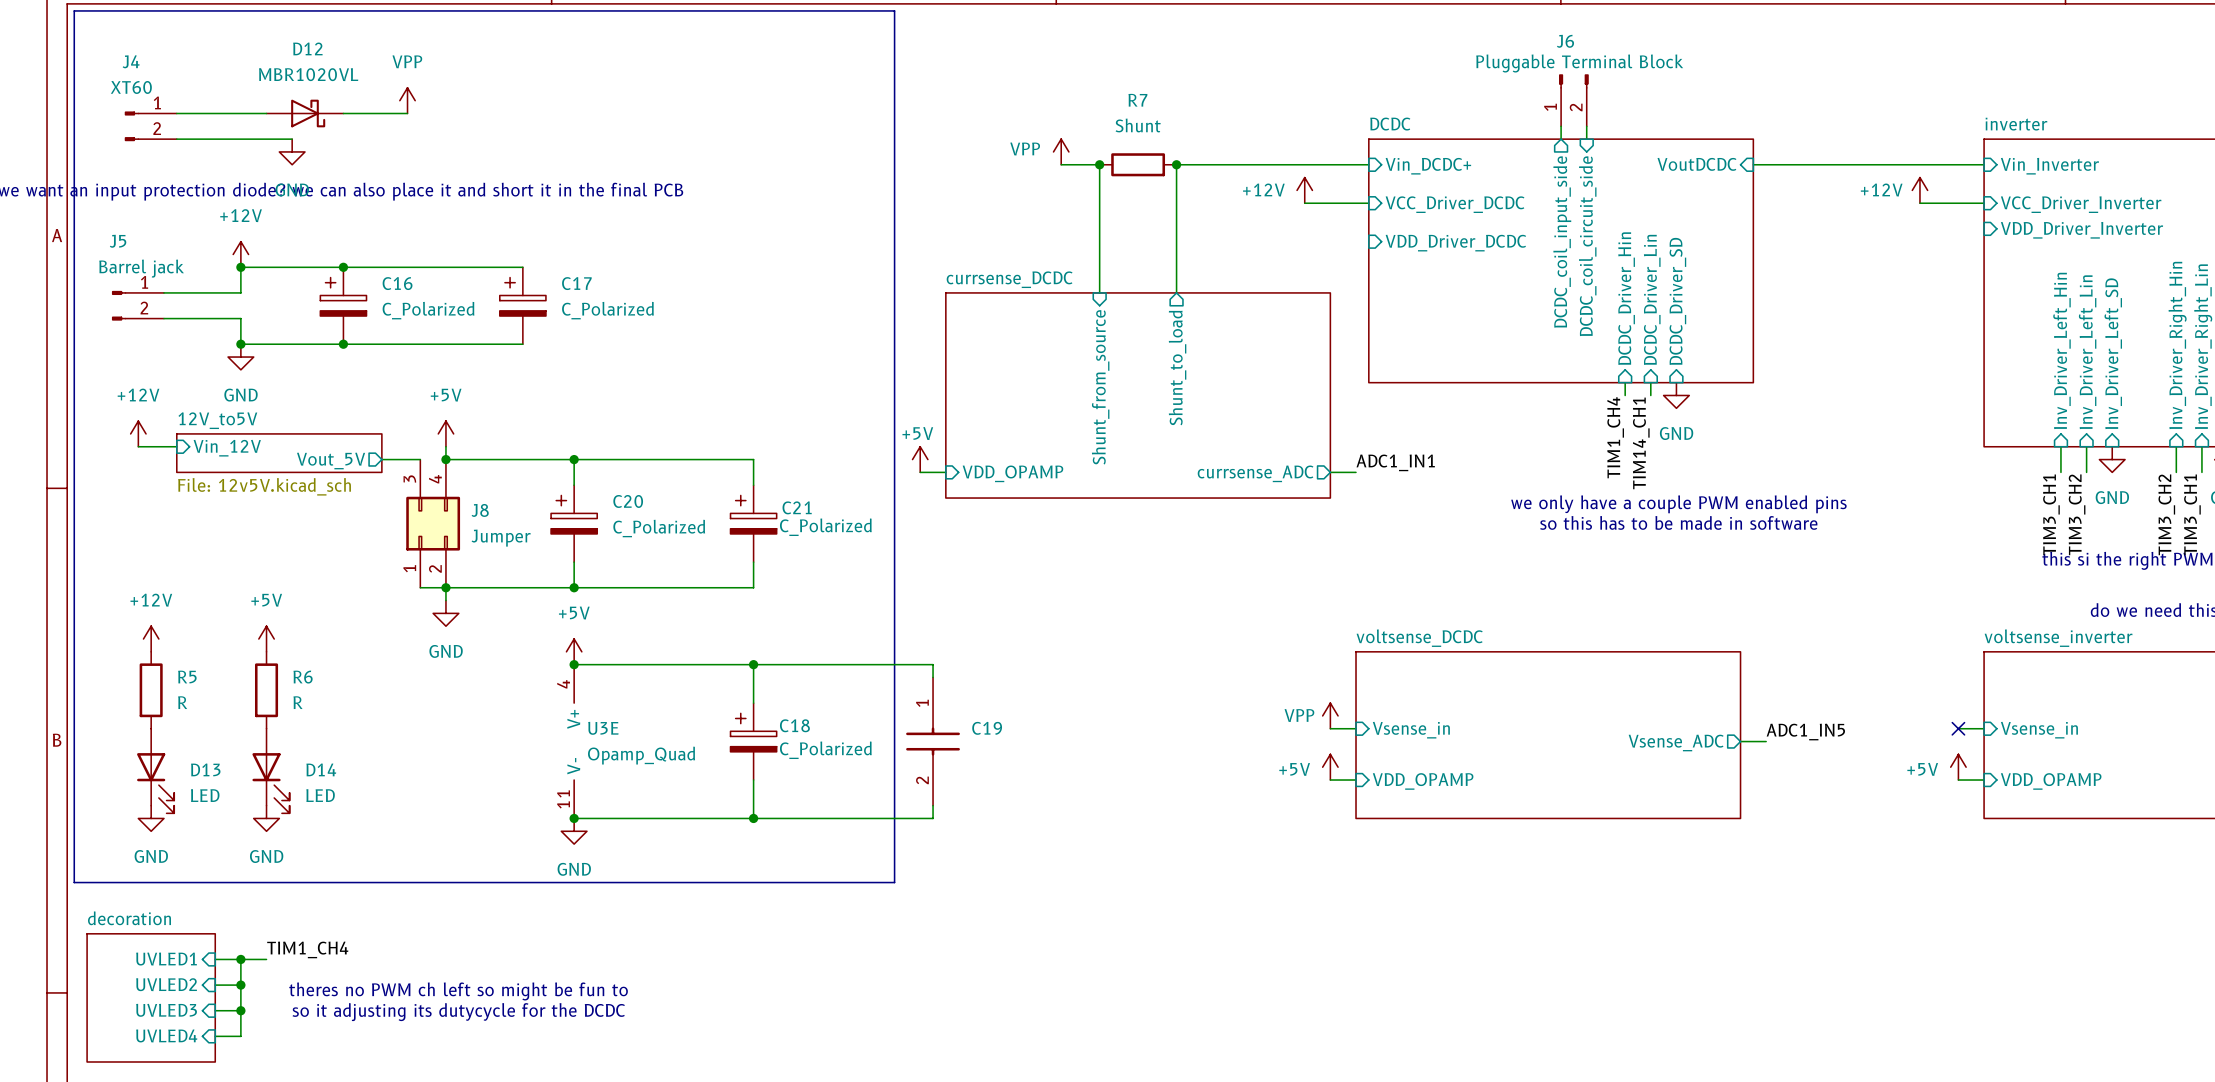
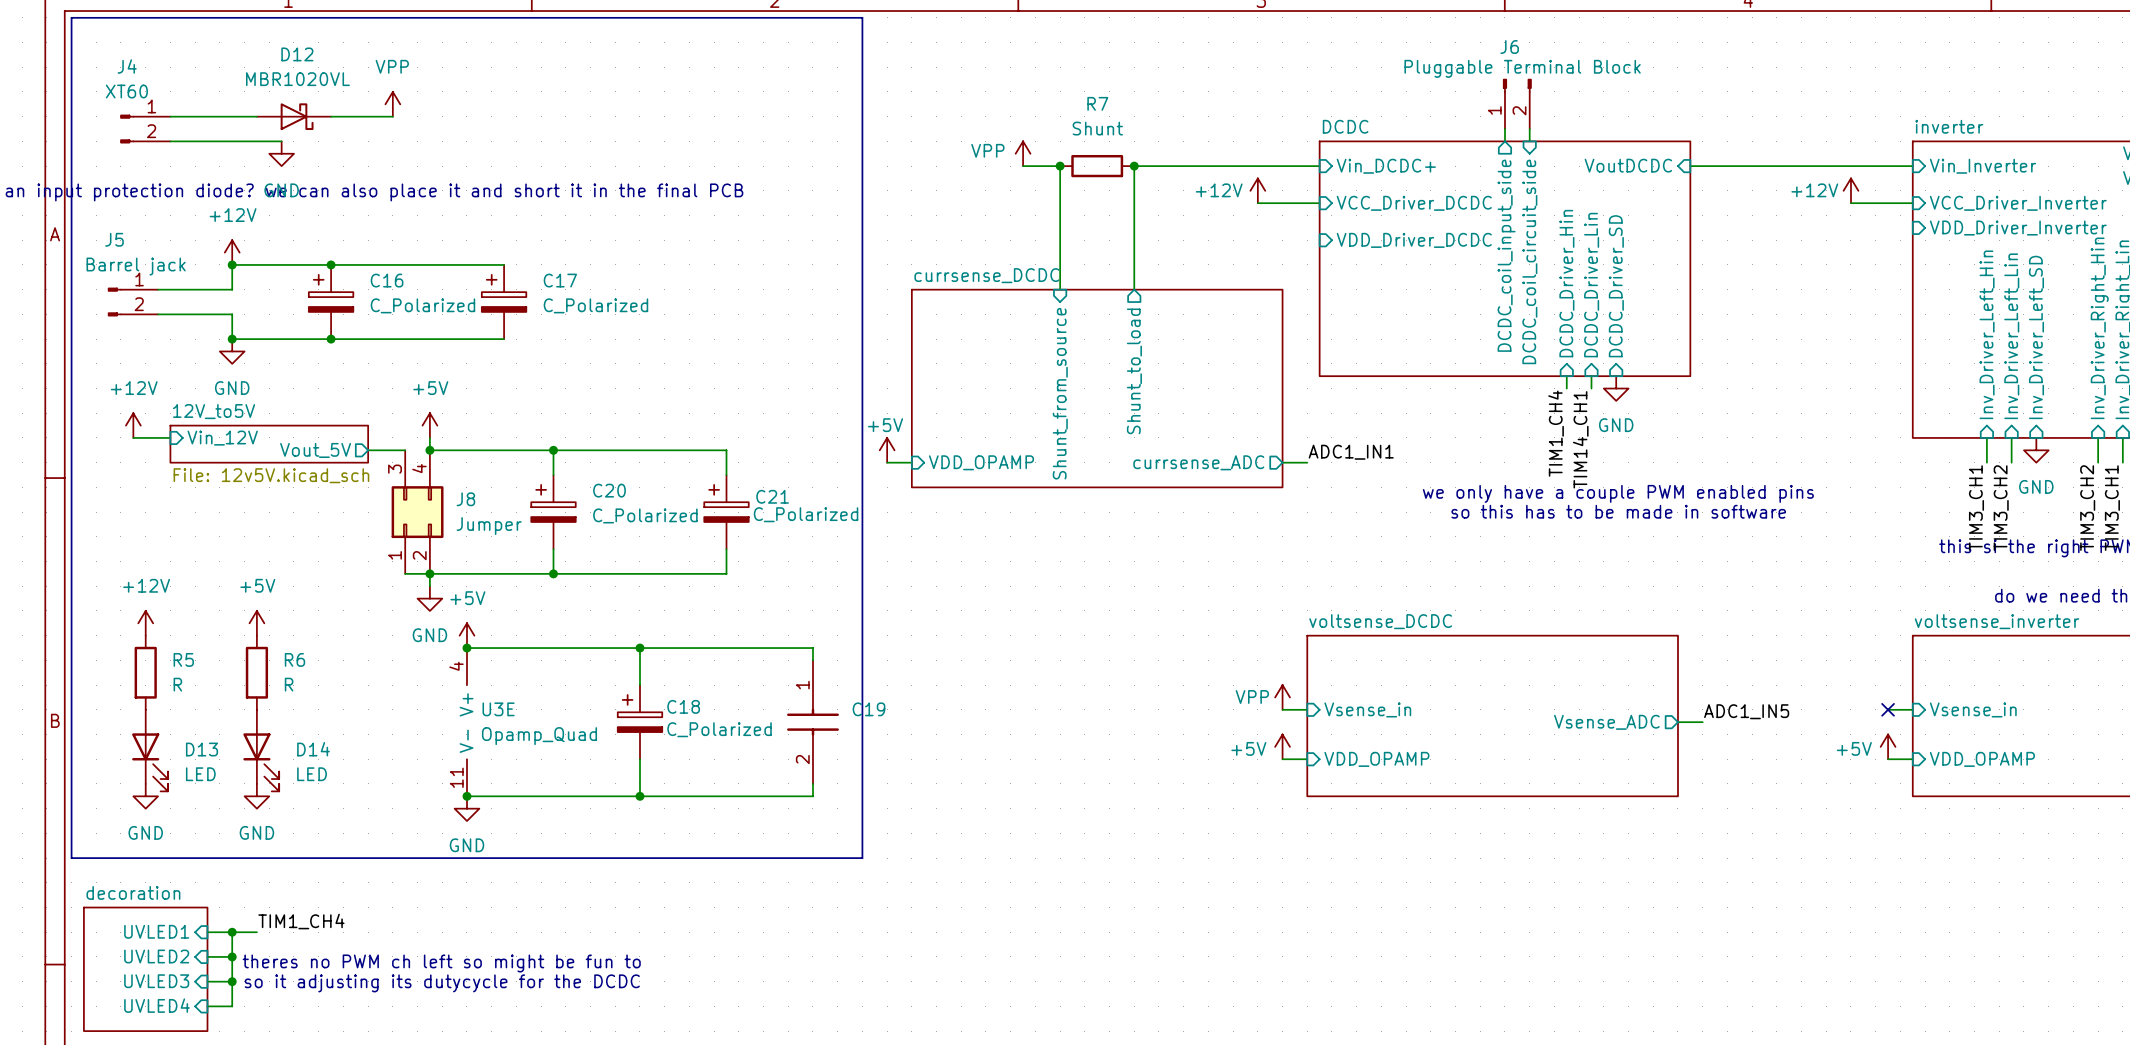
power symbol position: +5V (574, 651) -> +5V (466, 635)
wire: none -> (466, 648) (553, 648)
junction: none -> (466, 648)
junction: (574, 664) -> none
junction: none -> (639, 648)
wire: (753, 664) (753, 703) -> (639, 648) (639, 685)
junction: (753, 664) -> none
wire: (843, 664) (933, 664) (933, 677) -> (812, 648) (812, 660)
U3E position: (574, 741) -> (466, 722)
C18 position: (753, 741) -> (639, 722)
C19 position: (933, 741) -> (812, 722)
wire: (753, 780) (753, 818) -> (639, 759) (639, 796)
wire: (933, 805) (933, 818) (843, 818) -> (812, 783) (812, 796)
wire: none -> (466, 796) (553, 796)
junction: none -> (466, 796)
junction: (574, 818) -> none
junction: none -> (639, 796)
junction: (753, 818) -> none
power symbol position: GND (574, 831) -> GND (466, 808)

